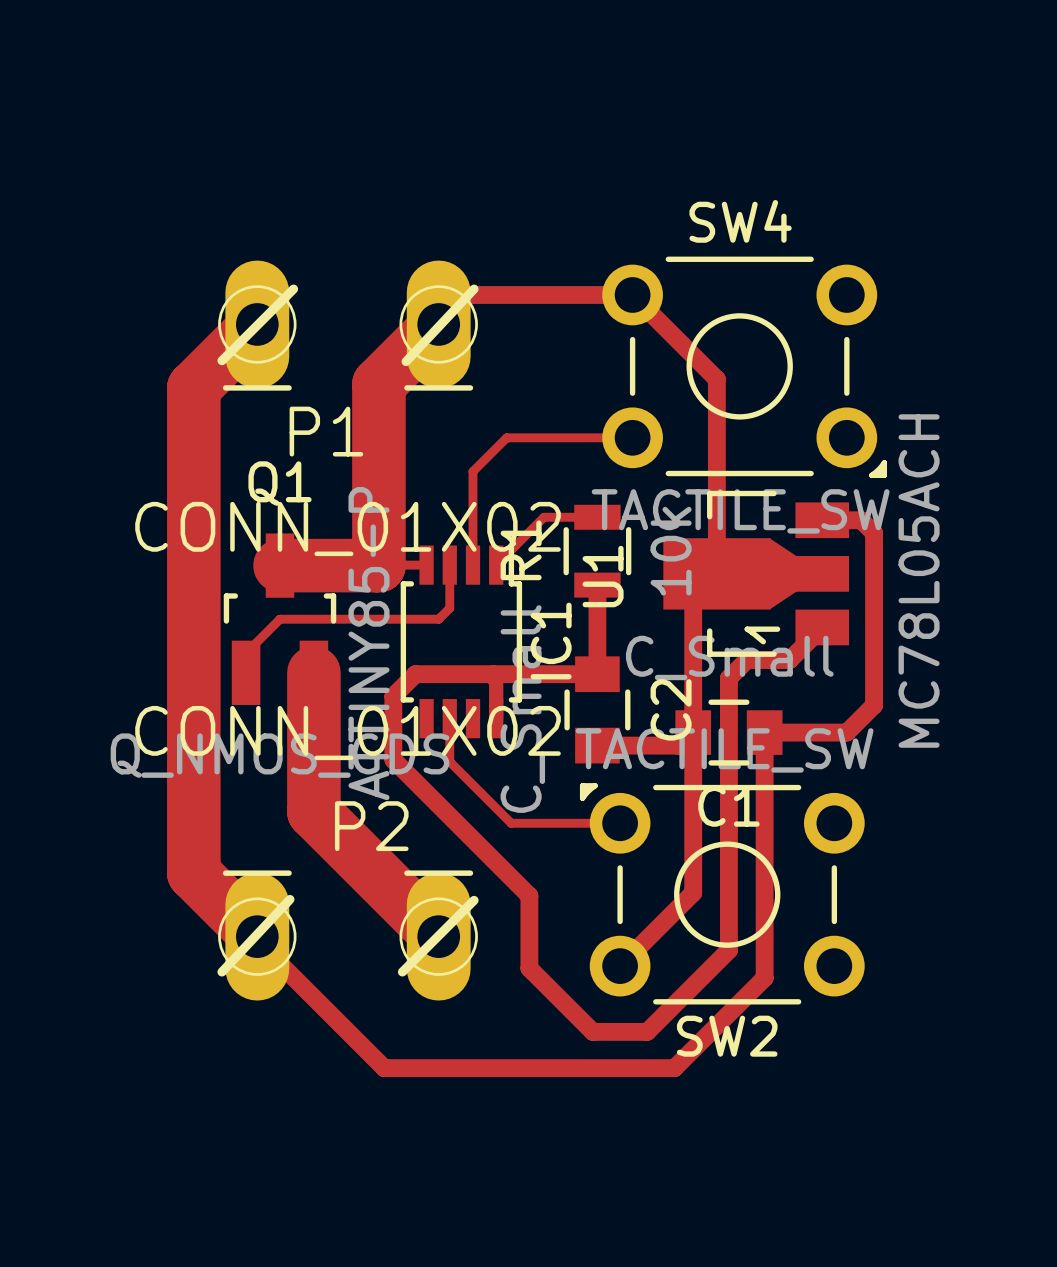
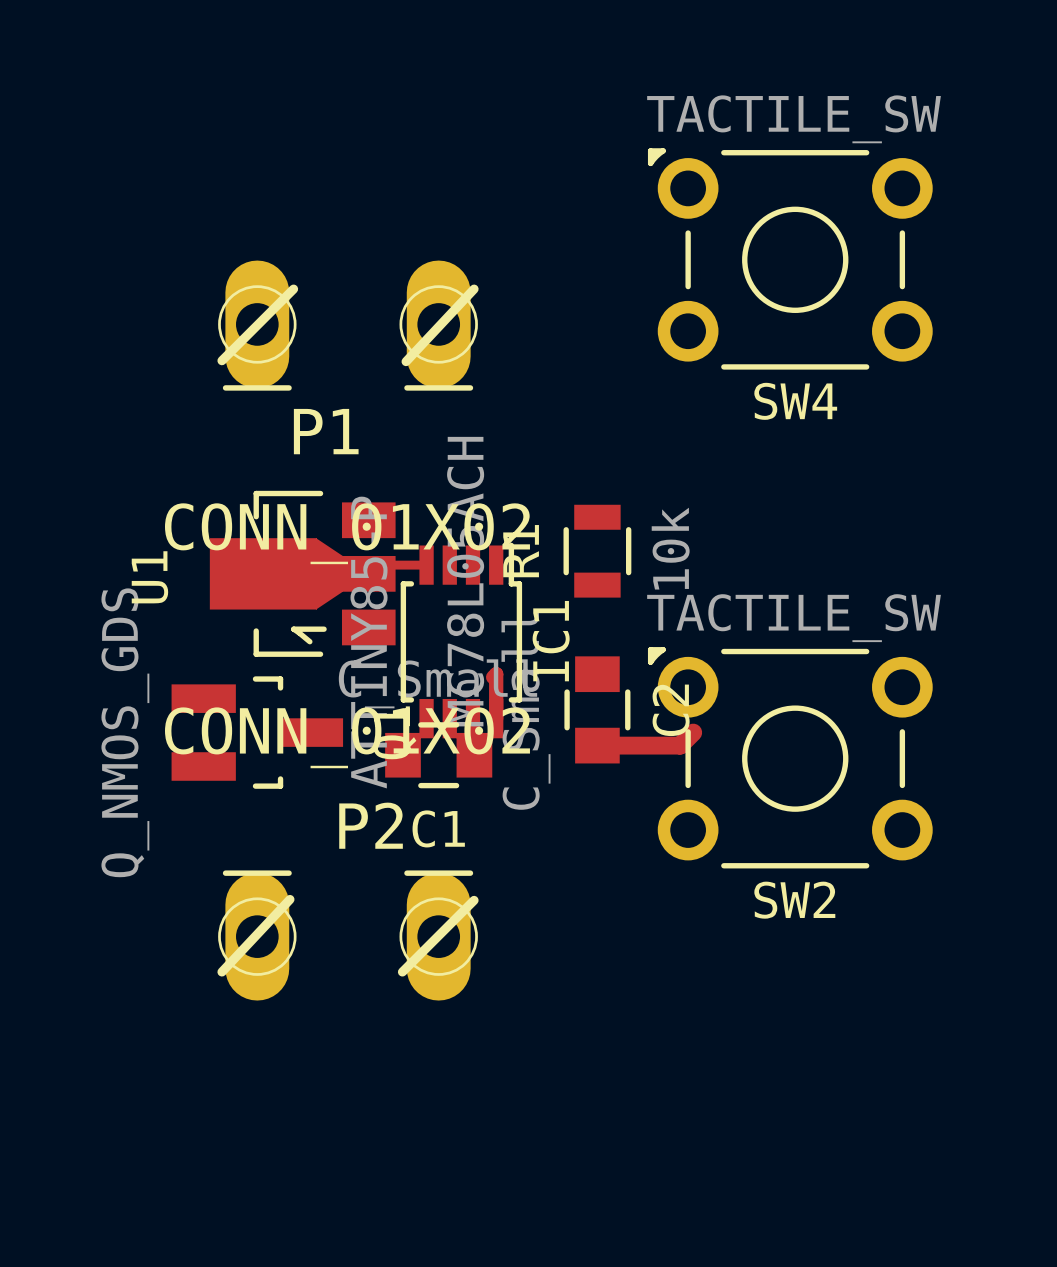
top track: (257, 324) (193, 387) (193, 873) (257, 936) (257, 941) (384, 1068) (674, 1068) (764, 978) (764, 732) (846, 732) (874, 705) (874, 533) (861, 520) (822, 520) -> none
SW4 rotation: 0° (744, 367) -> 180° (790, 258)
top track: (632, 437) (506, 437) (472, 471) (472, 565) -> none
top track: (597, 517) (544, 517) (496, 565) -> none
top track: (279, 565) (378, 565) (378, 384) (468, 294) (632, 294) (716, 379) (716, 573) -> none
top track: (449, 565) (449, 608) (438, 619) (279, 619) (246, 653) (246, 672) -> none
top track: (716, 573) (693, 597) (693, 892) (620, 966) -> none
U1 position: (756, 573) -> (302, 573)
top track: (597, 585) (597, 674) (415, 674) (393, 696) (393, 759) (529, 895) (529, 968) (592, 1031) (647, 1031) (728, 950) (728, 678) (747, 660) (789, 660) (822, 627) -> none
Q1 rotation: 0° (279, 619) -> 90° clockwise (257, 732)
Q1 position: (279, 619) -> (257, 732)
top track: (313, 672) (313, 811) (438, 936) -> none
top track: (447, 720) (449, 718) (449, 761) (511, 823) (620, 823) -> none
C1 position: (728, 732) -> (438, 755)
SW2 position: (722, 893) -> (790, 757)

